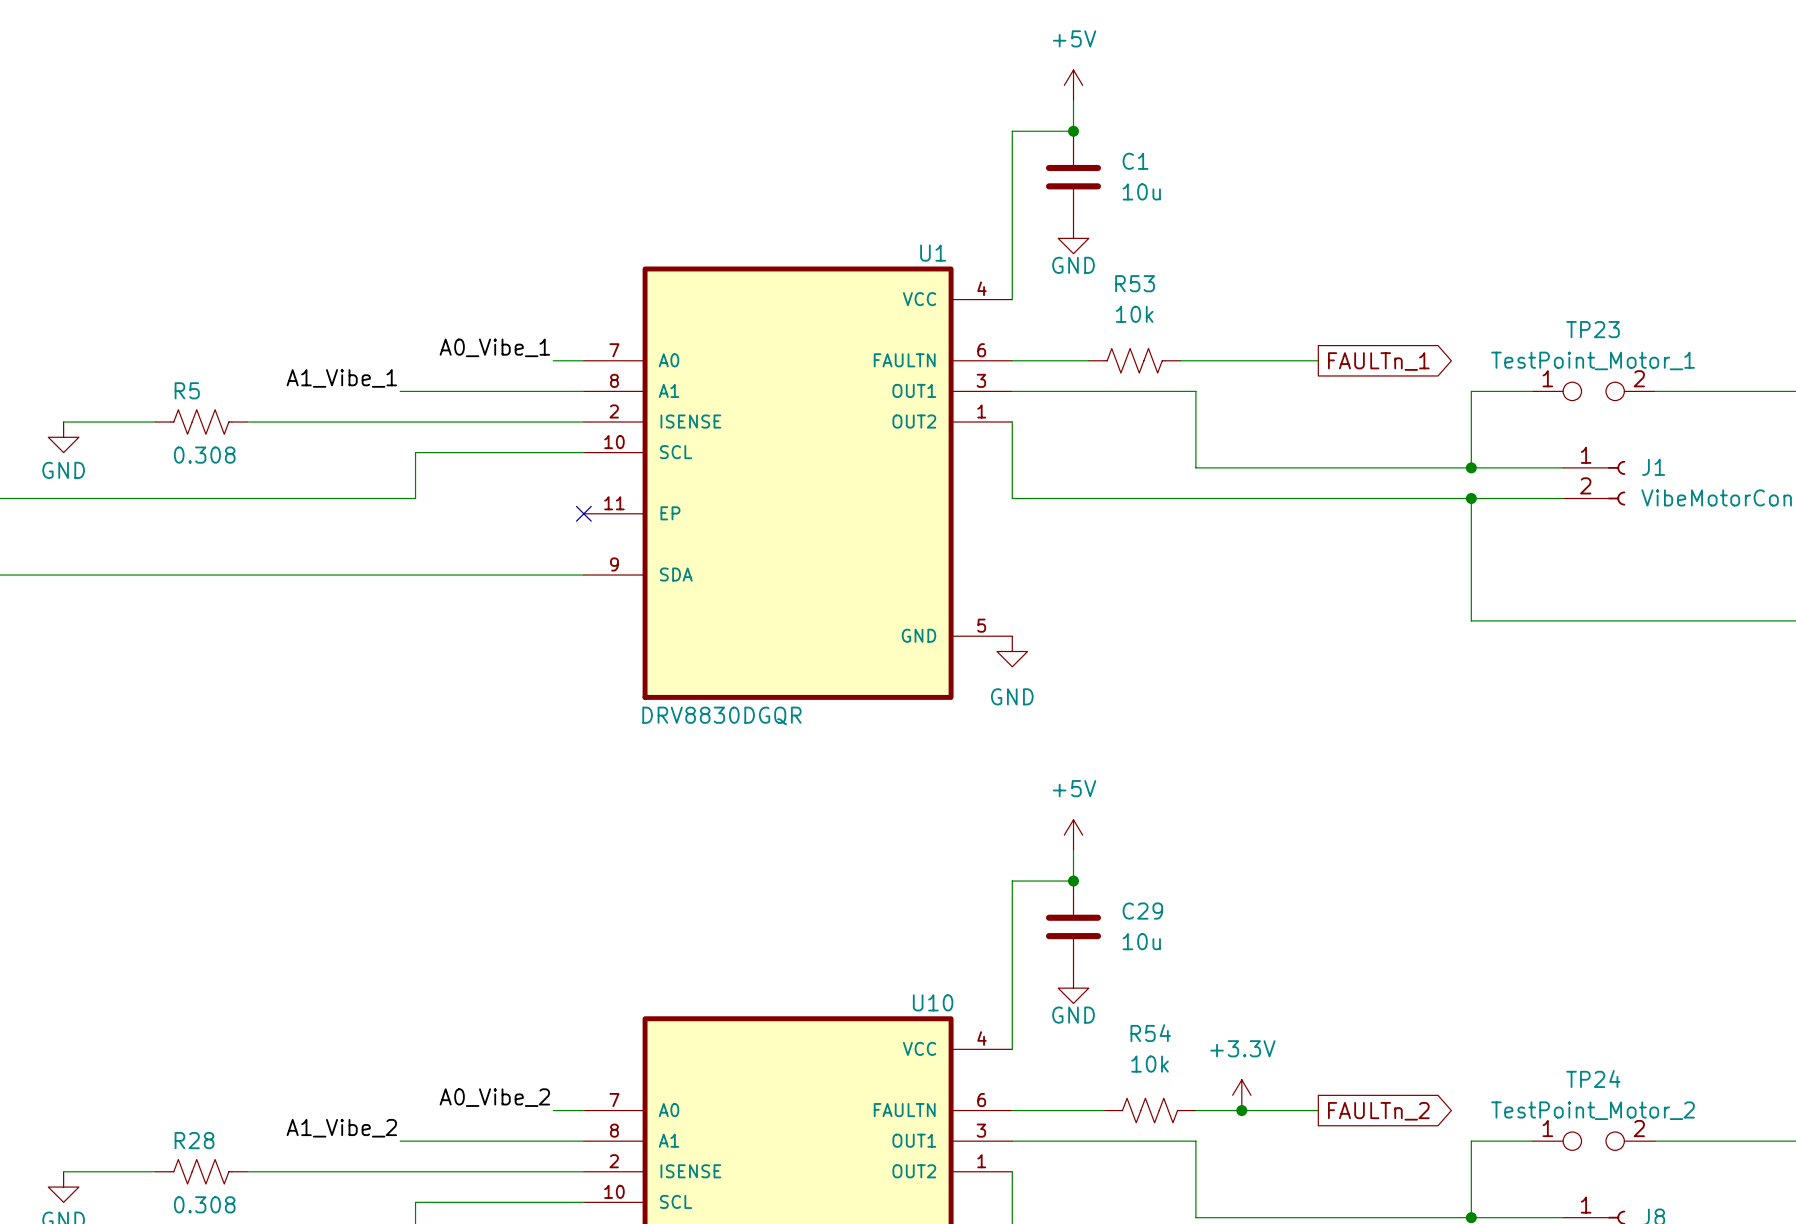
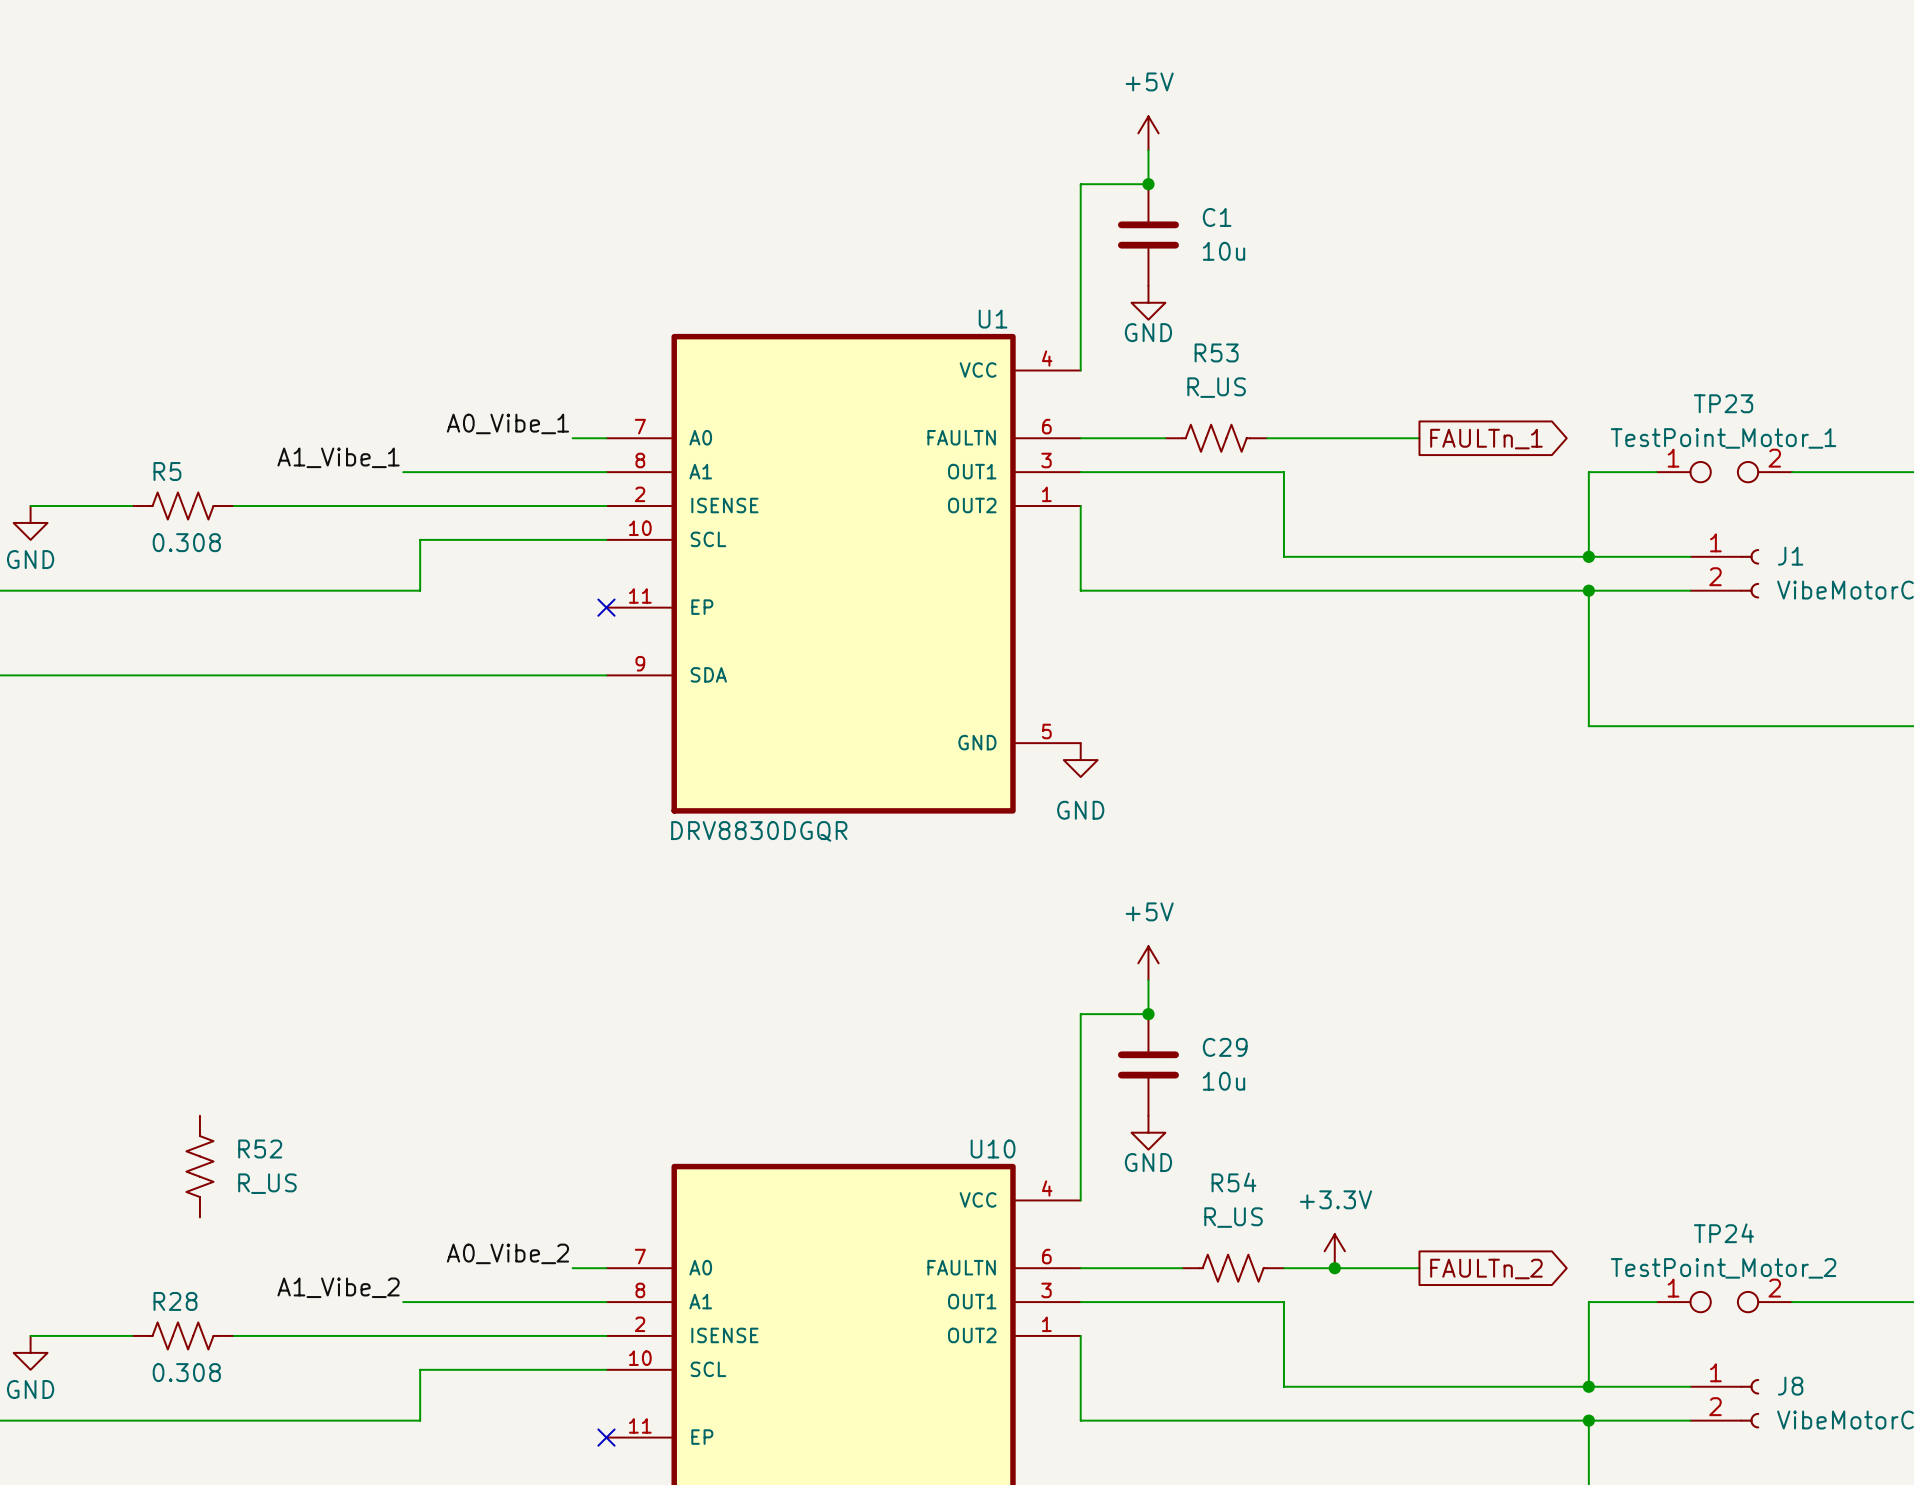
R53 value: 10k (1134, 314) -> R_US (1216, 387)
R52: none -> R_US (199, 1166)
R54 value: 10k (1150, 1064) -> R_US (1233, 1217)

